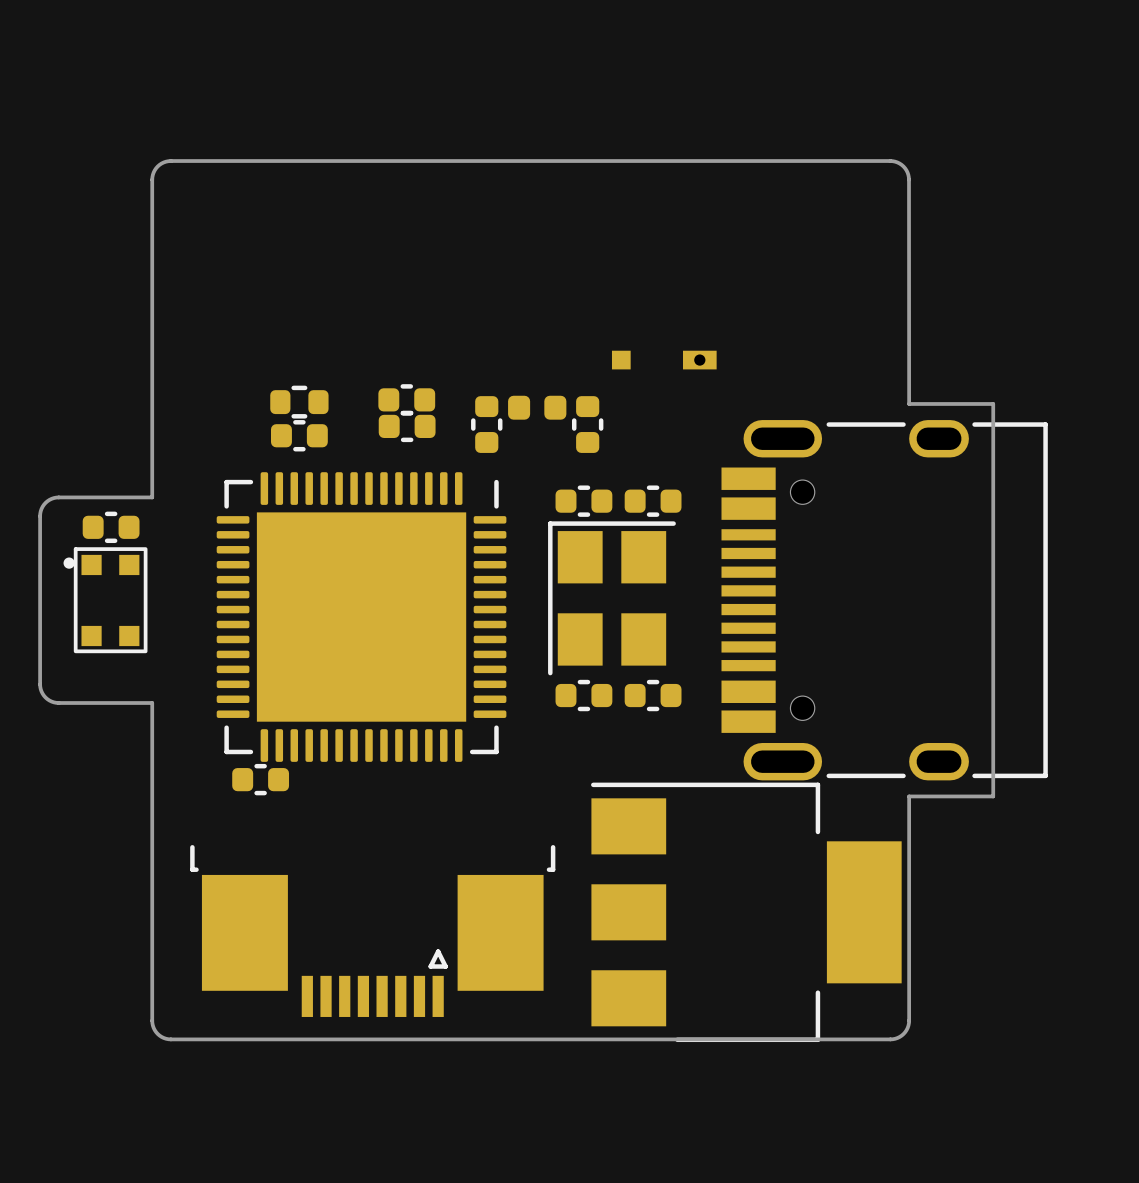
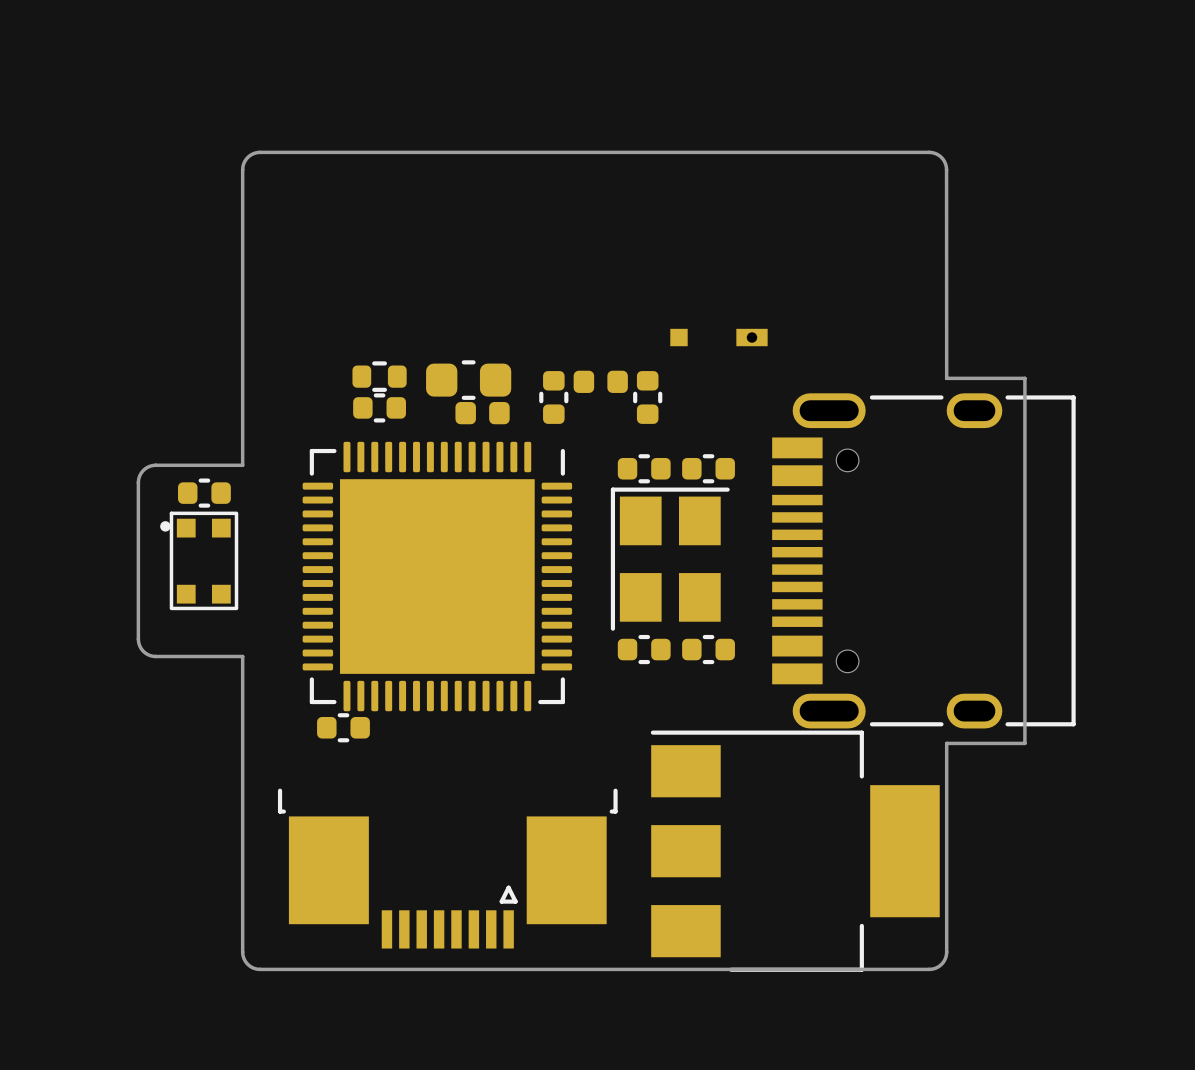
part: (406, 399) -> none
part: none -> (468, 380)
part: (407, 426) -> none
part: none -> (482, 413)

